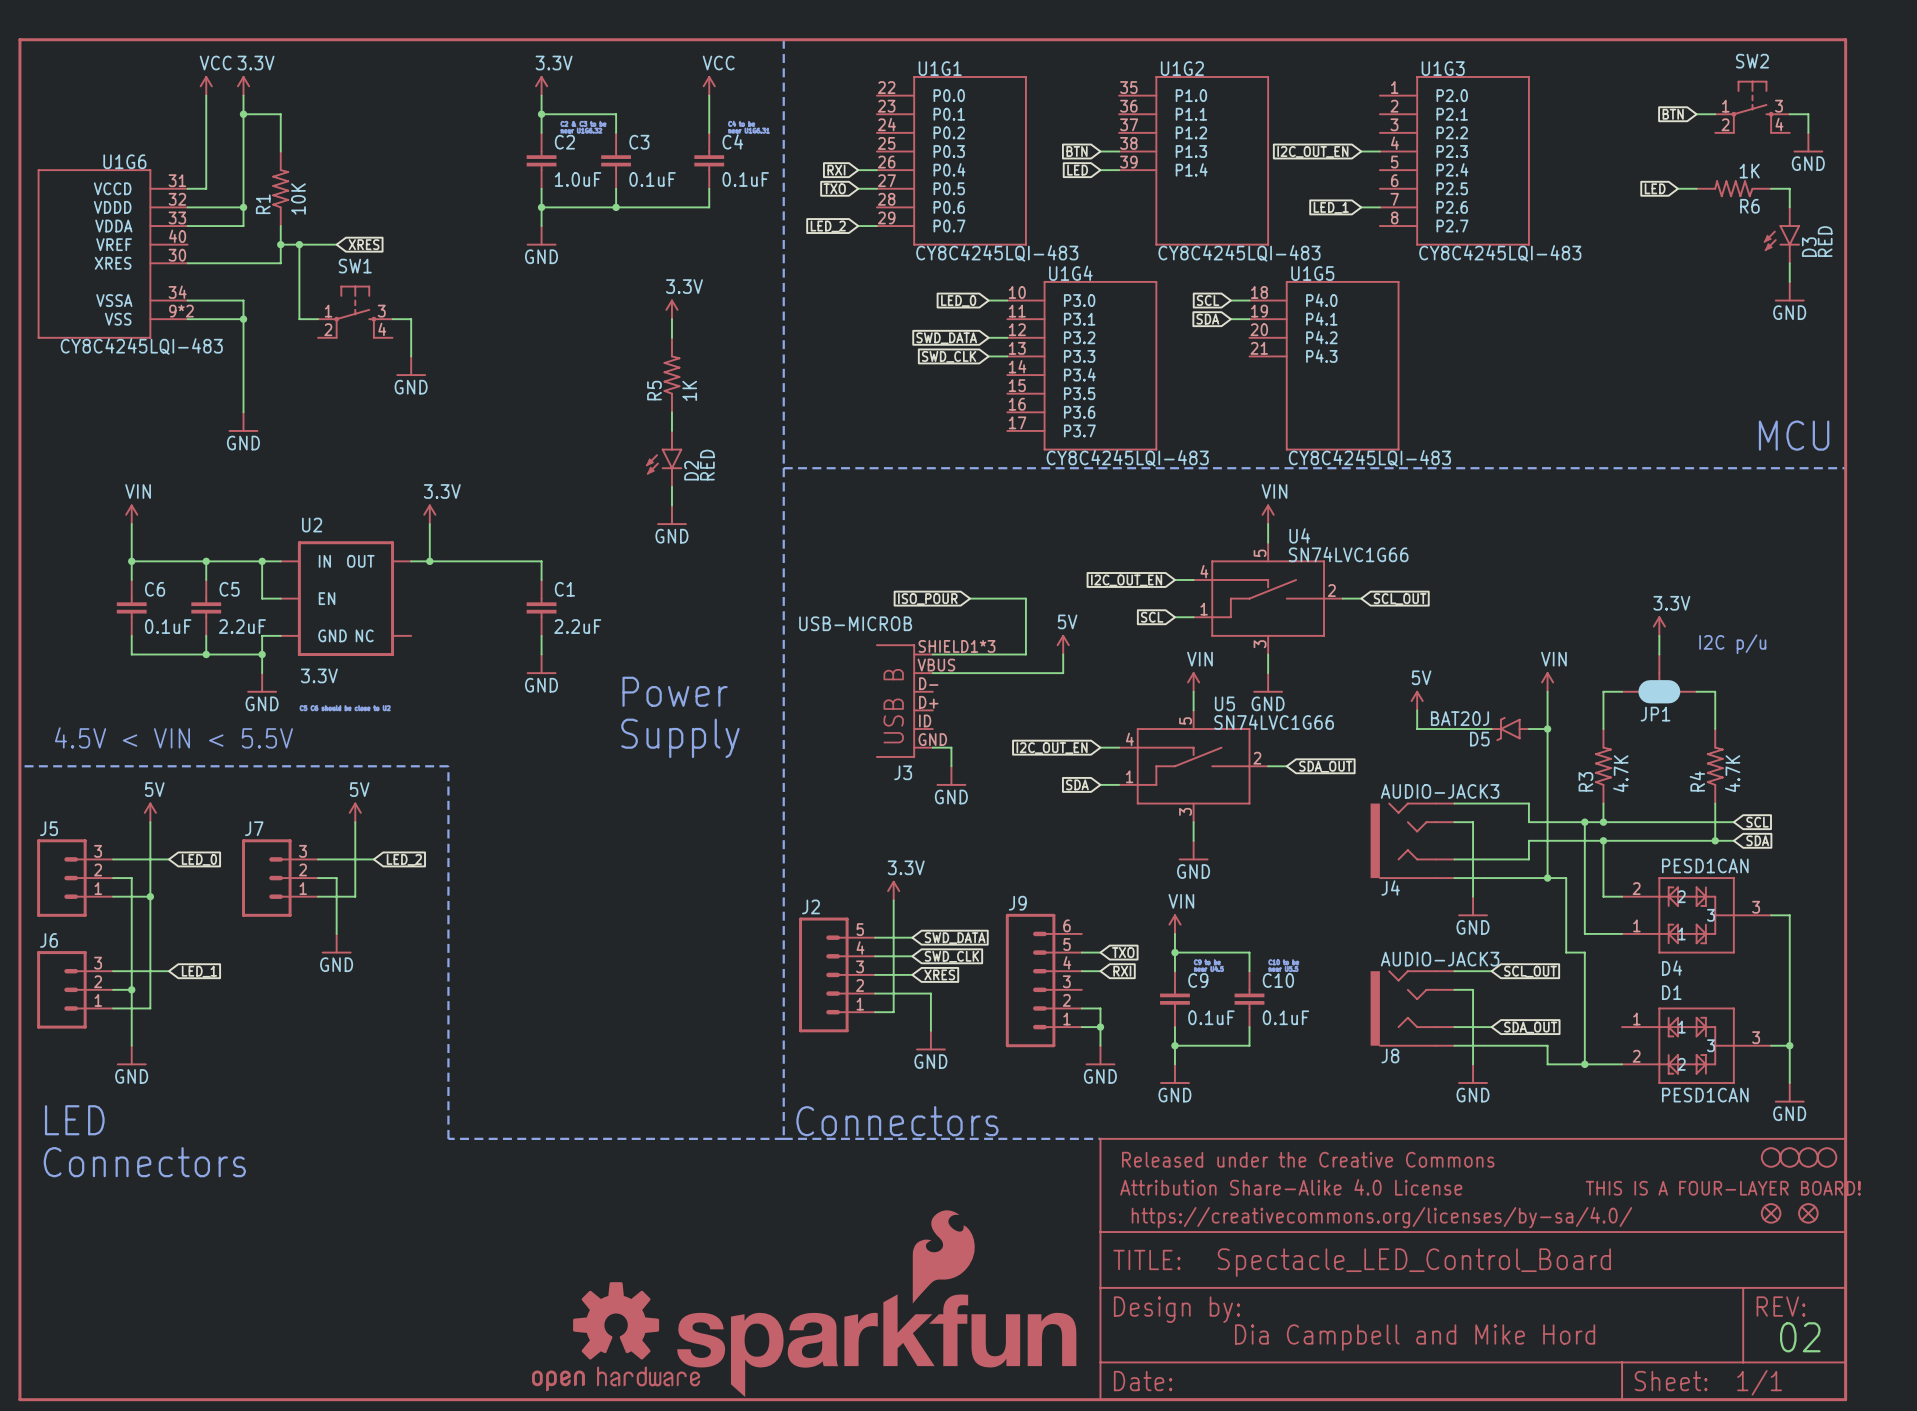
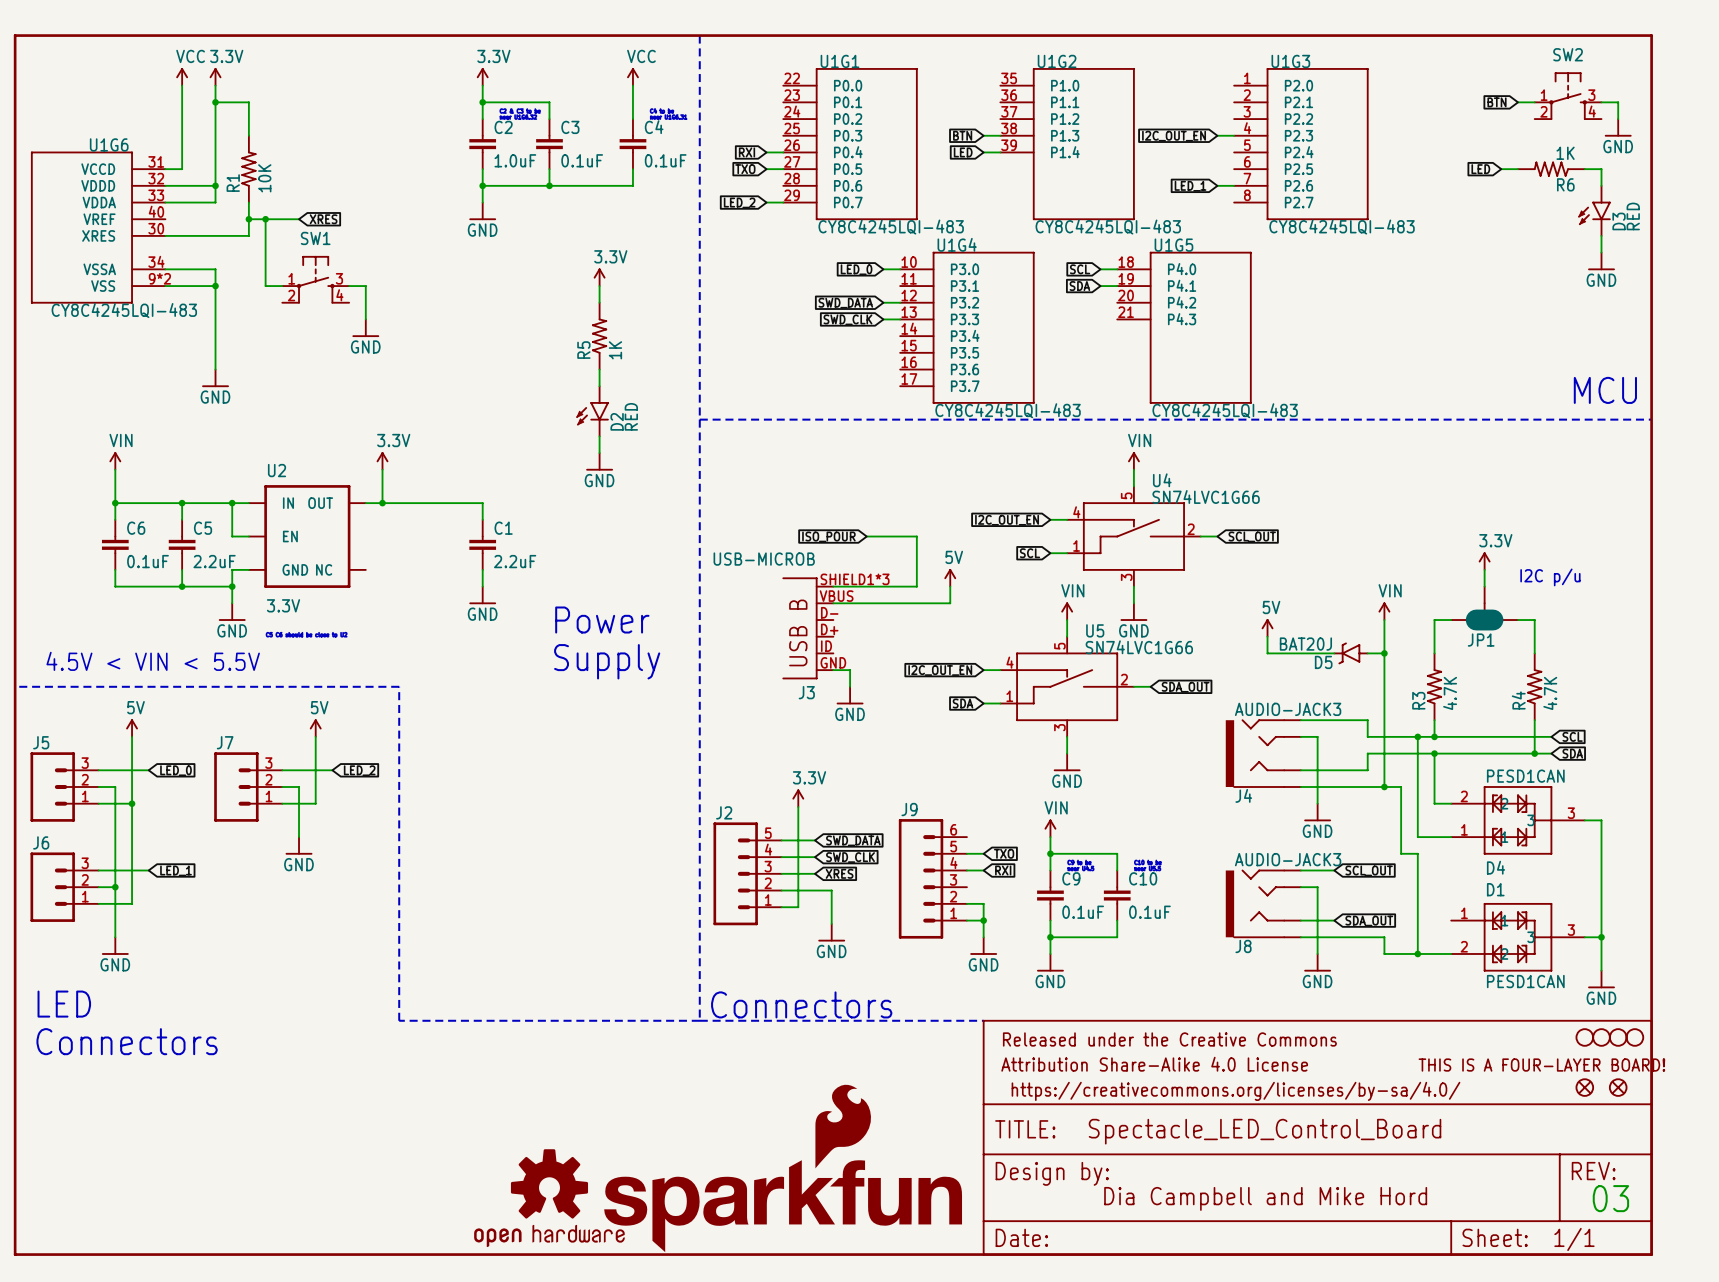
text: 02 (1800, 1337) -> 03 (1610, 1198)

